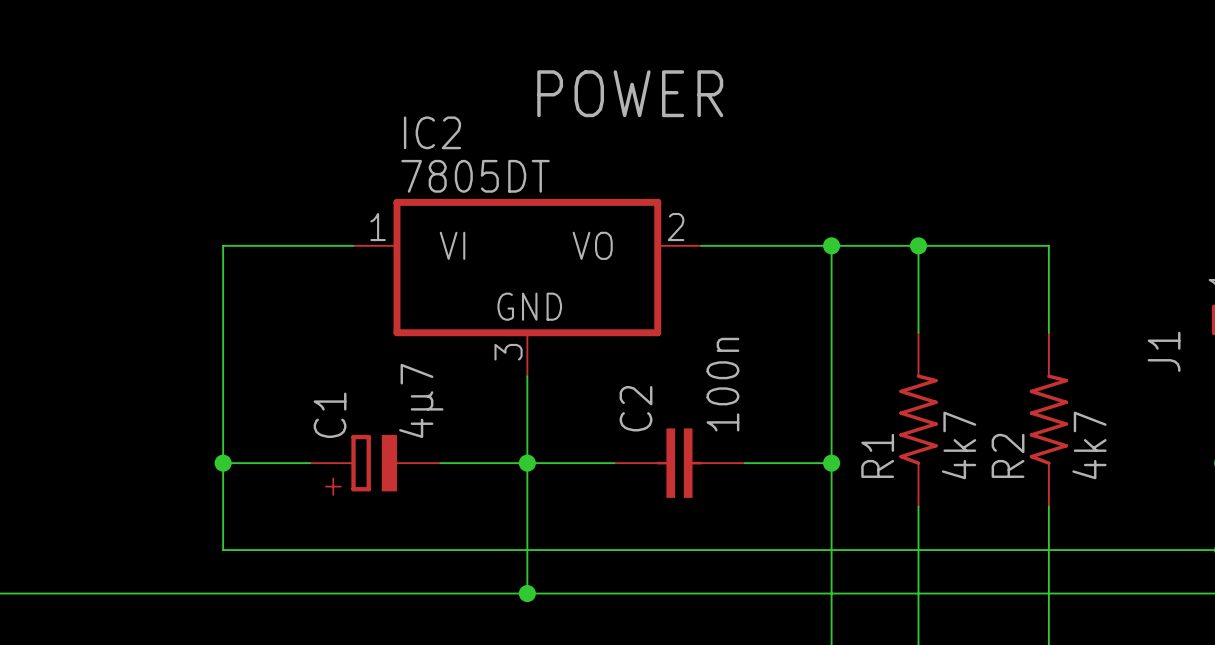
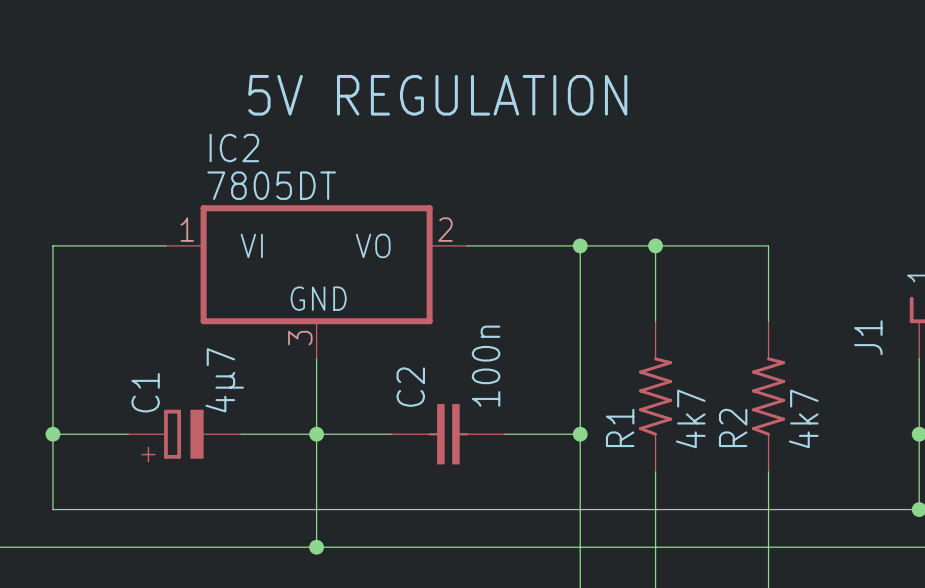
text: none -> 5V REGULATION (437, 95)
text: POWER (630, 93) -> none

